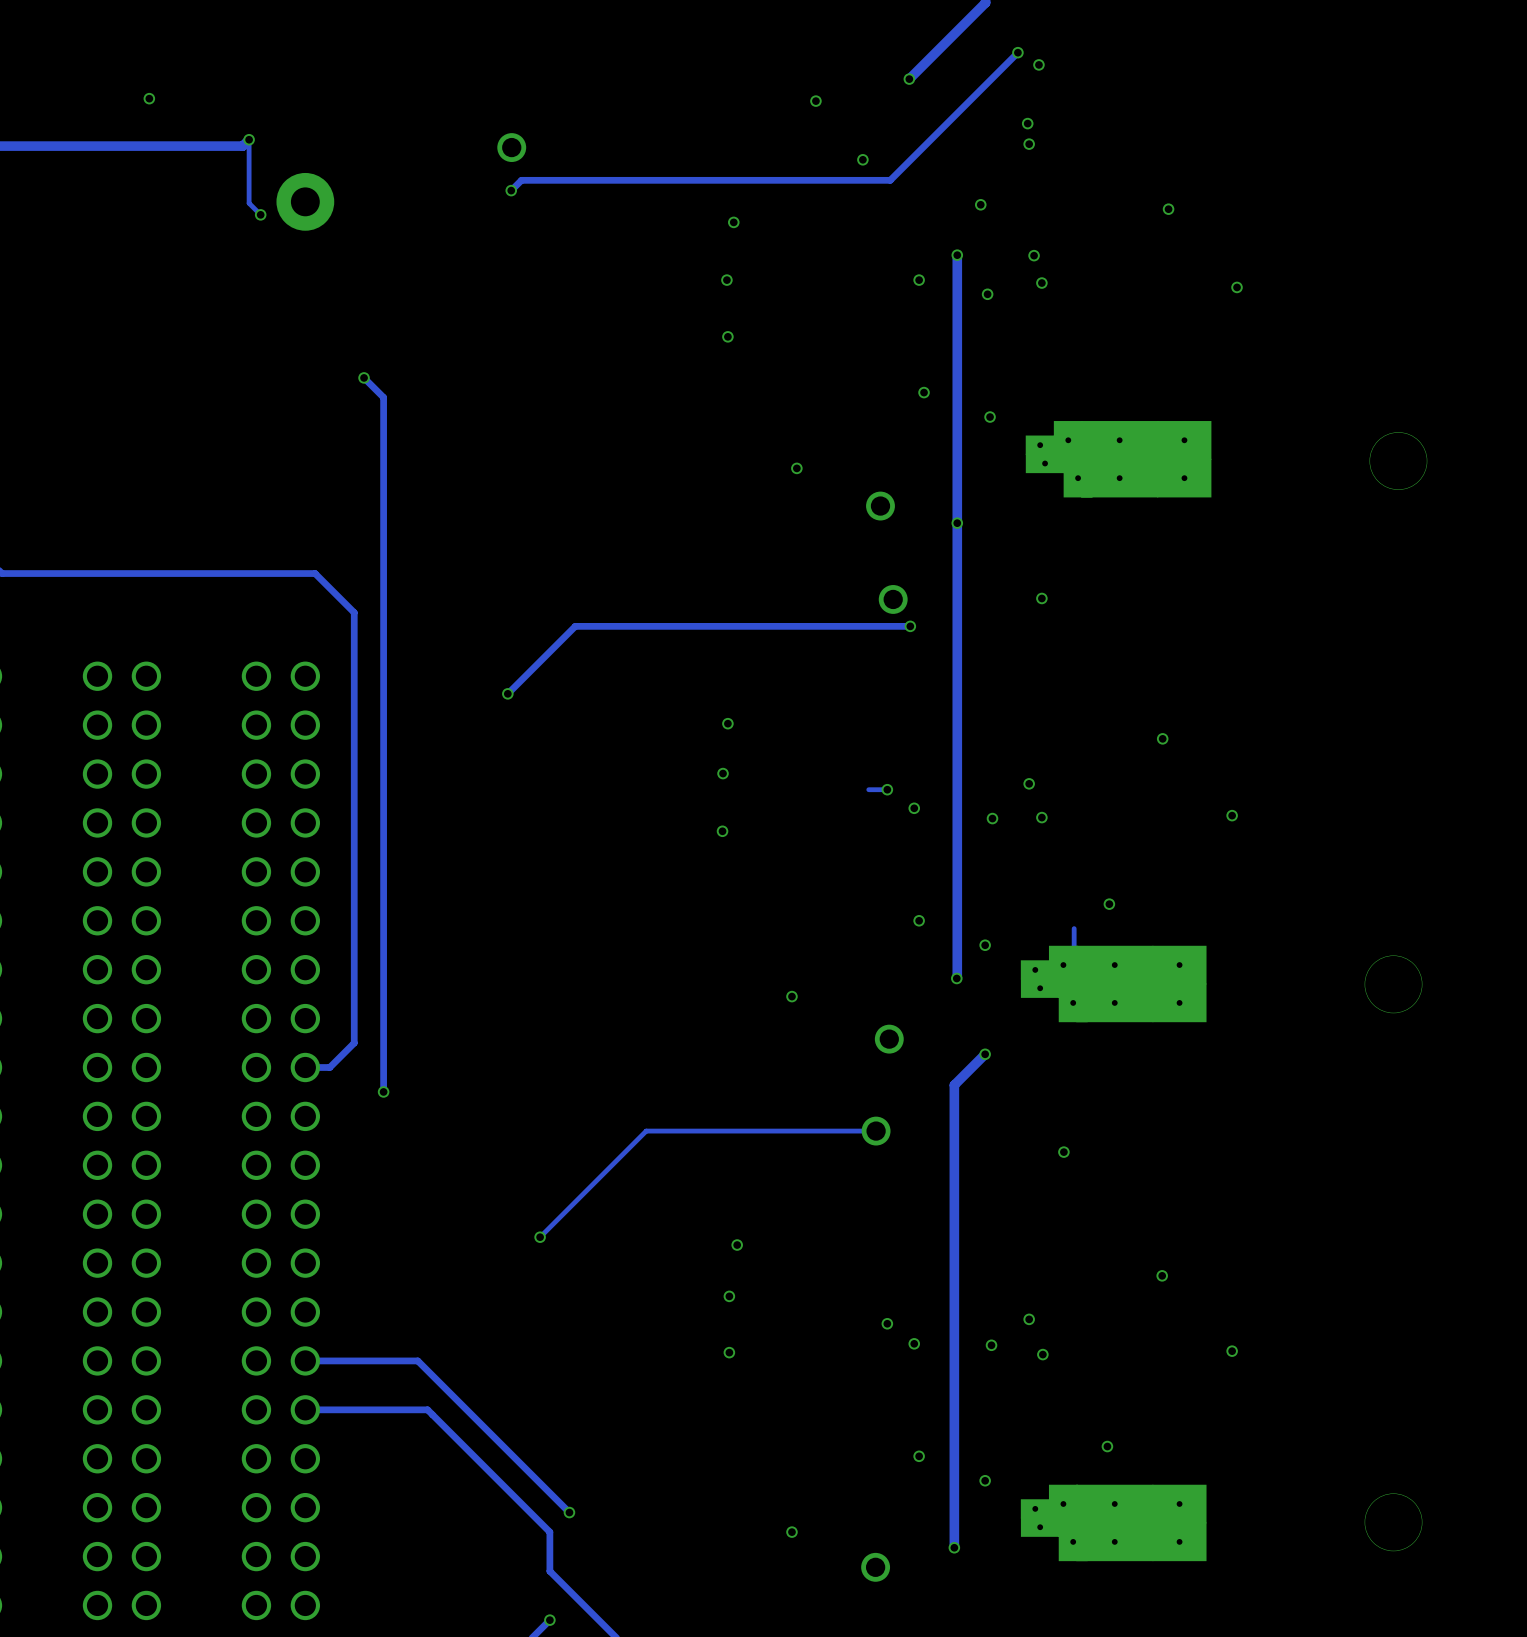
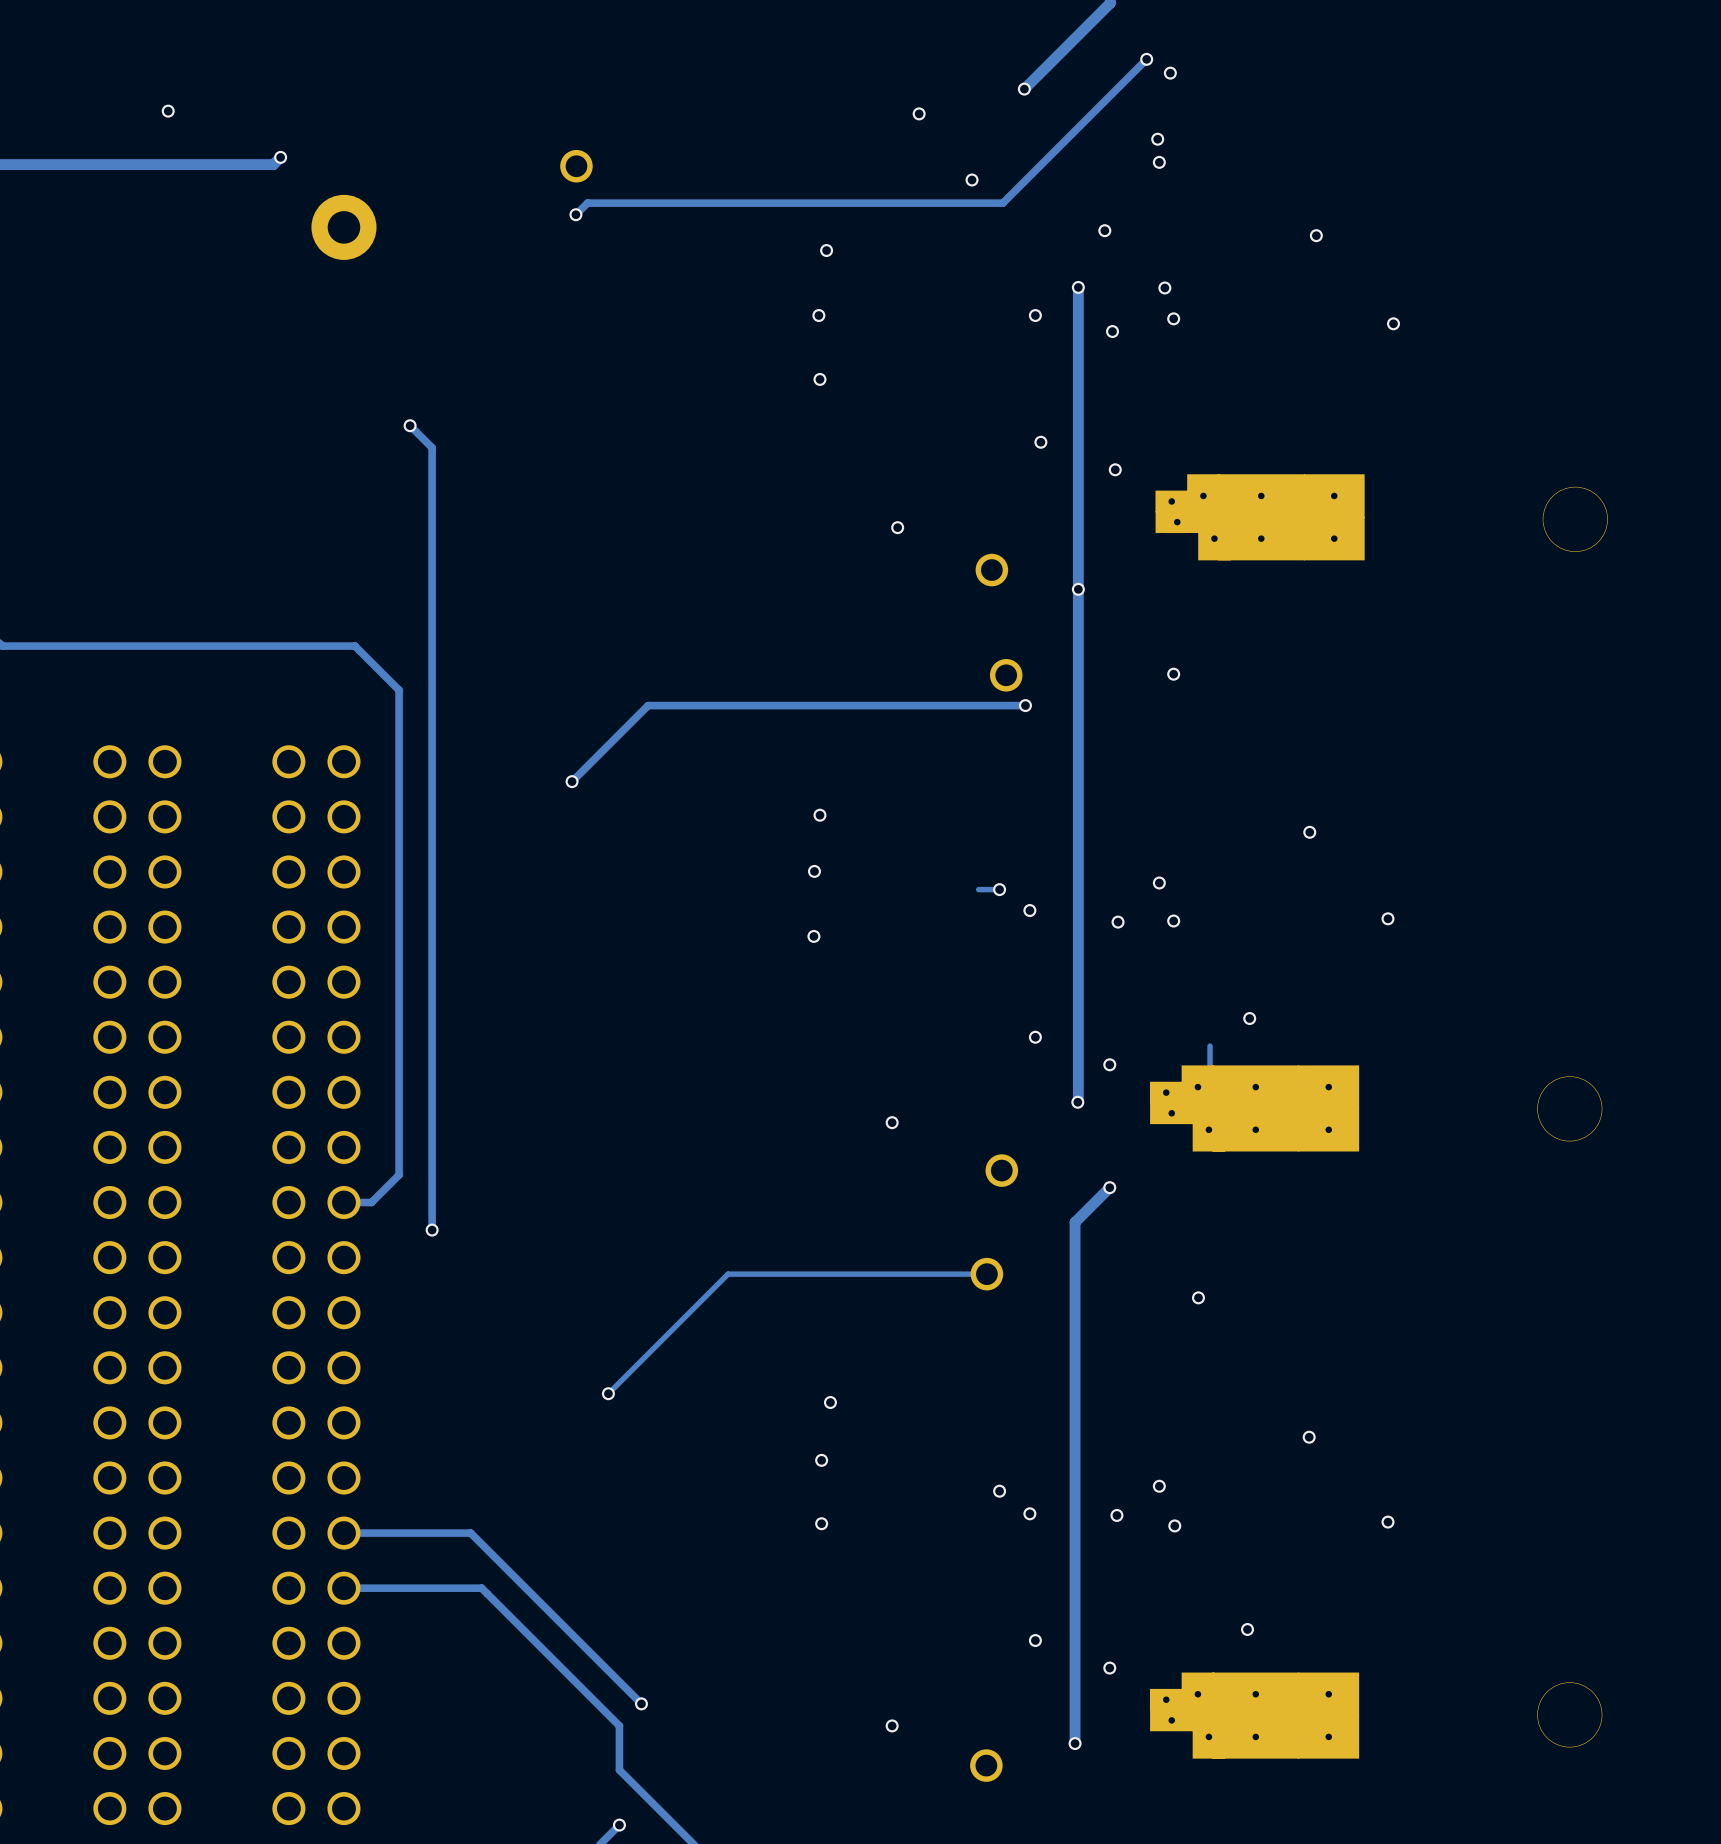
track: (249, 139) (249, 203) (260, 214) -> none
via: (260, 214) -> none

